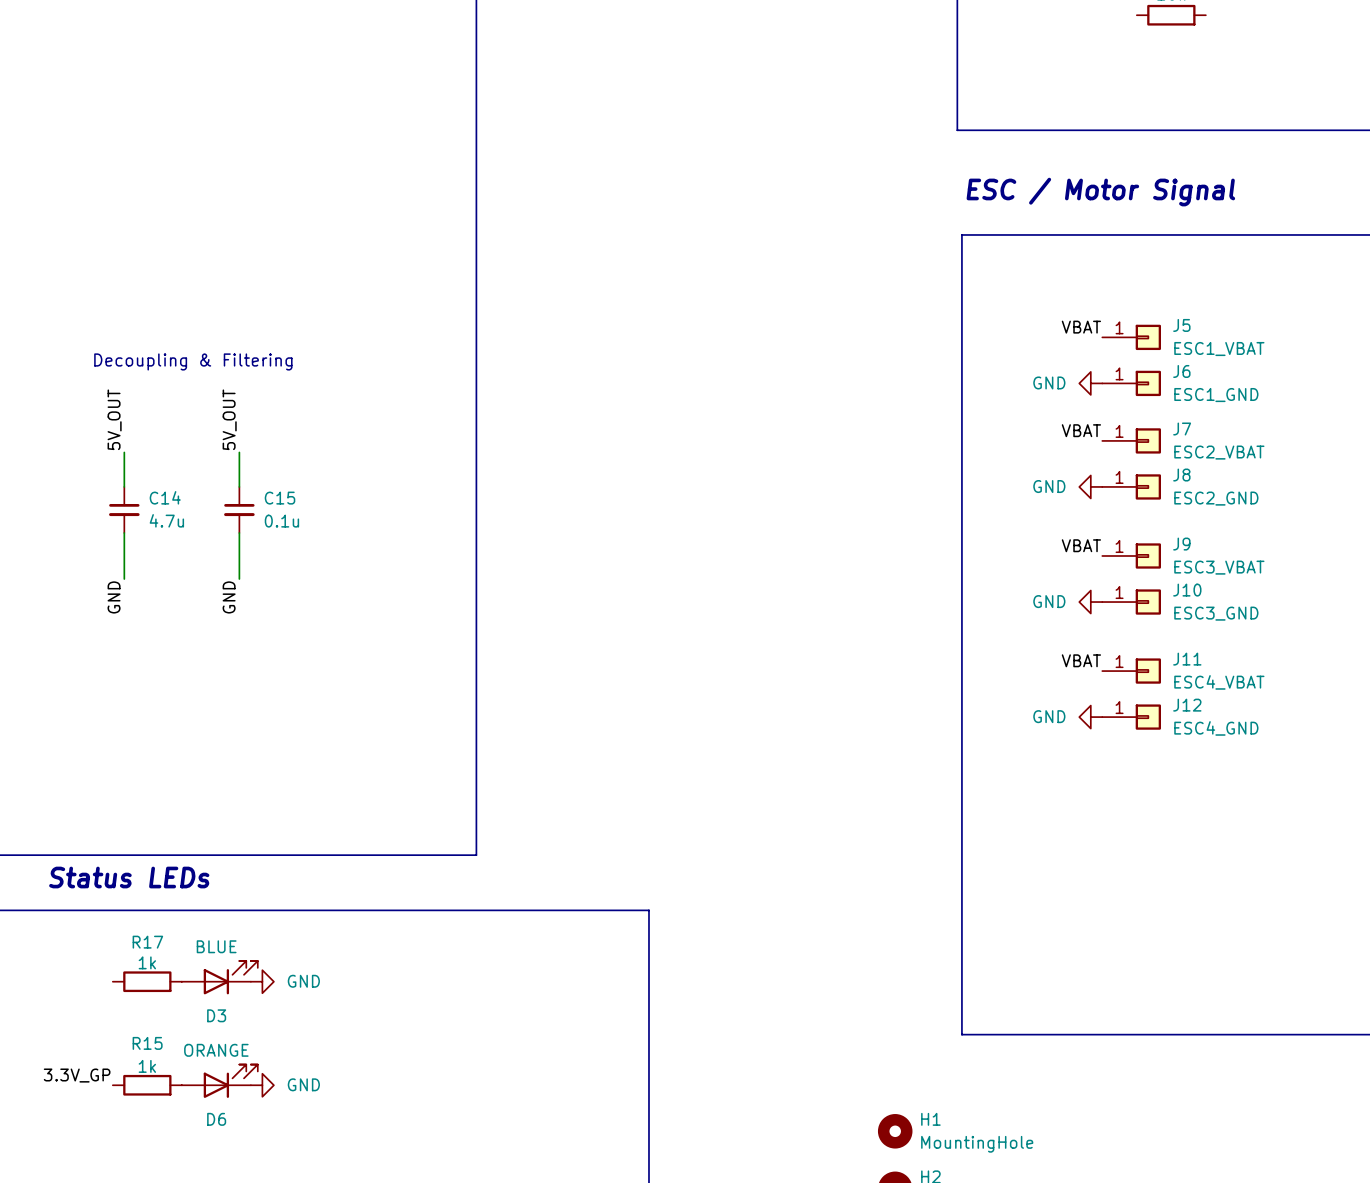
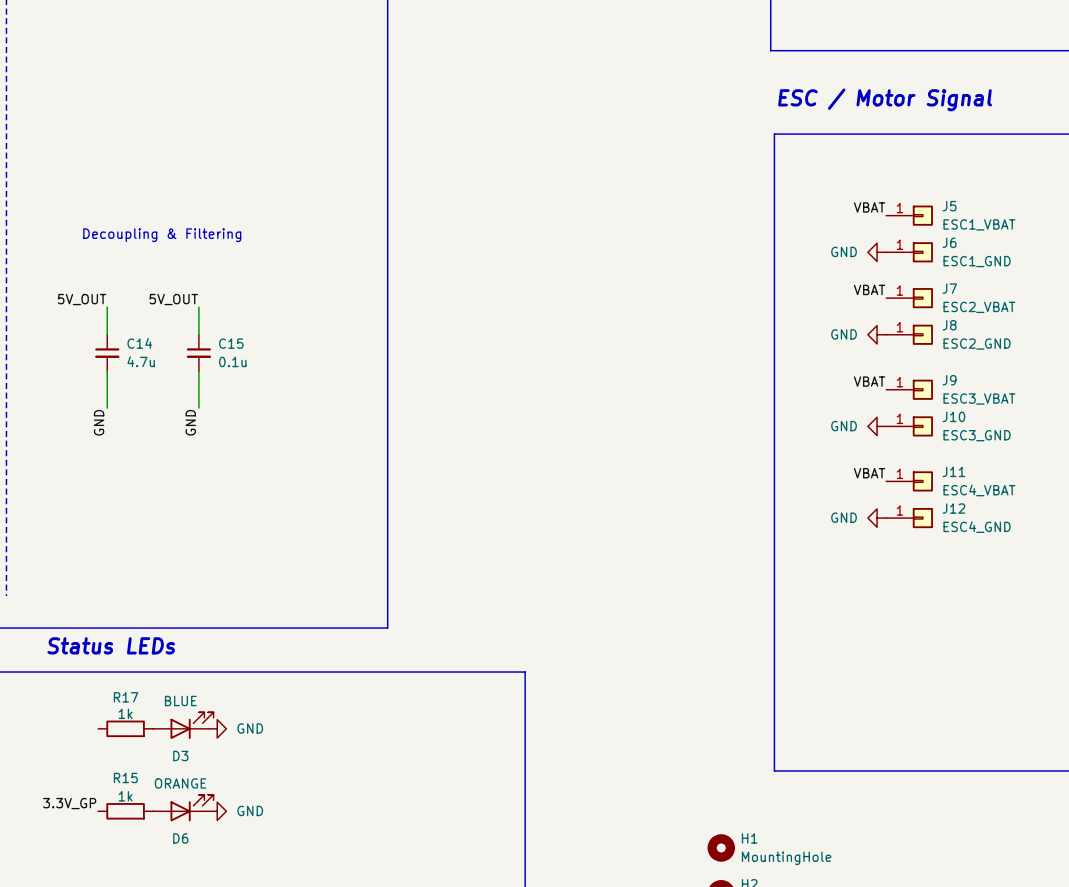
label rotation: 0° (114, 419) -> 90° clockwise (82, 299)
label rotation: 0° (229, 419) -> 90° clockwise (173, 299)

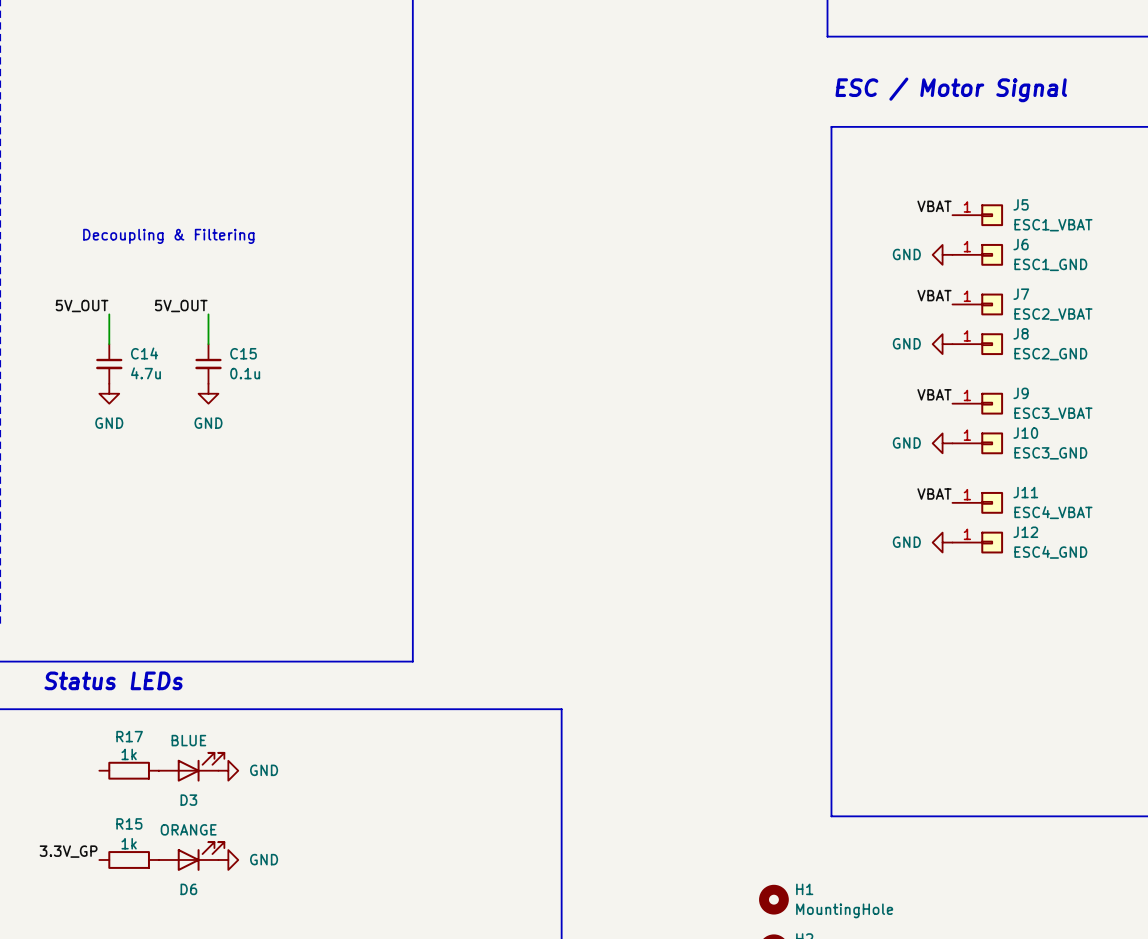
wire: (107, 371) (107, 408) -> none
wire: (198, 371) (198, 408) -> none
power symbol: none -> GND (109, 393)
power symbol: none -> GND (208, 393)
label: GND (99, 422) -> none
label: GND (190, 422) -> none

